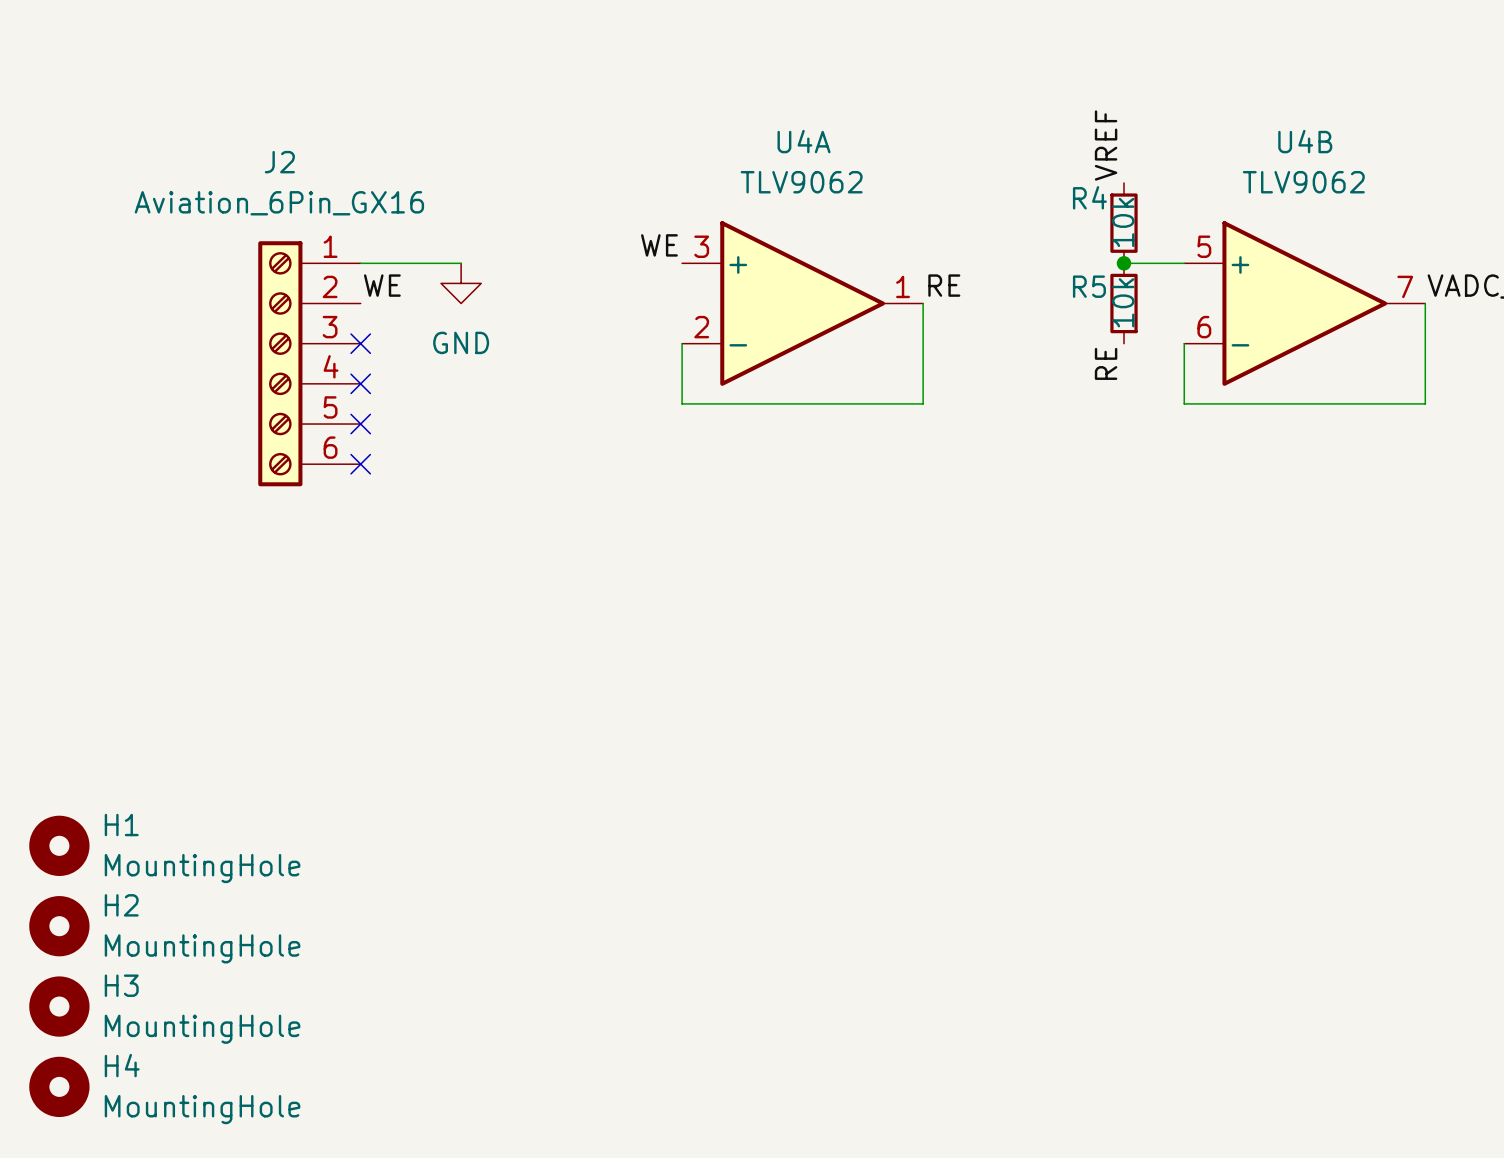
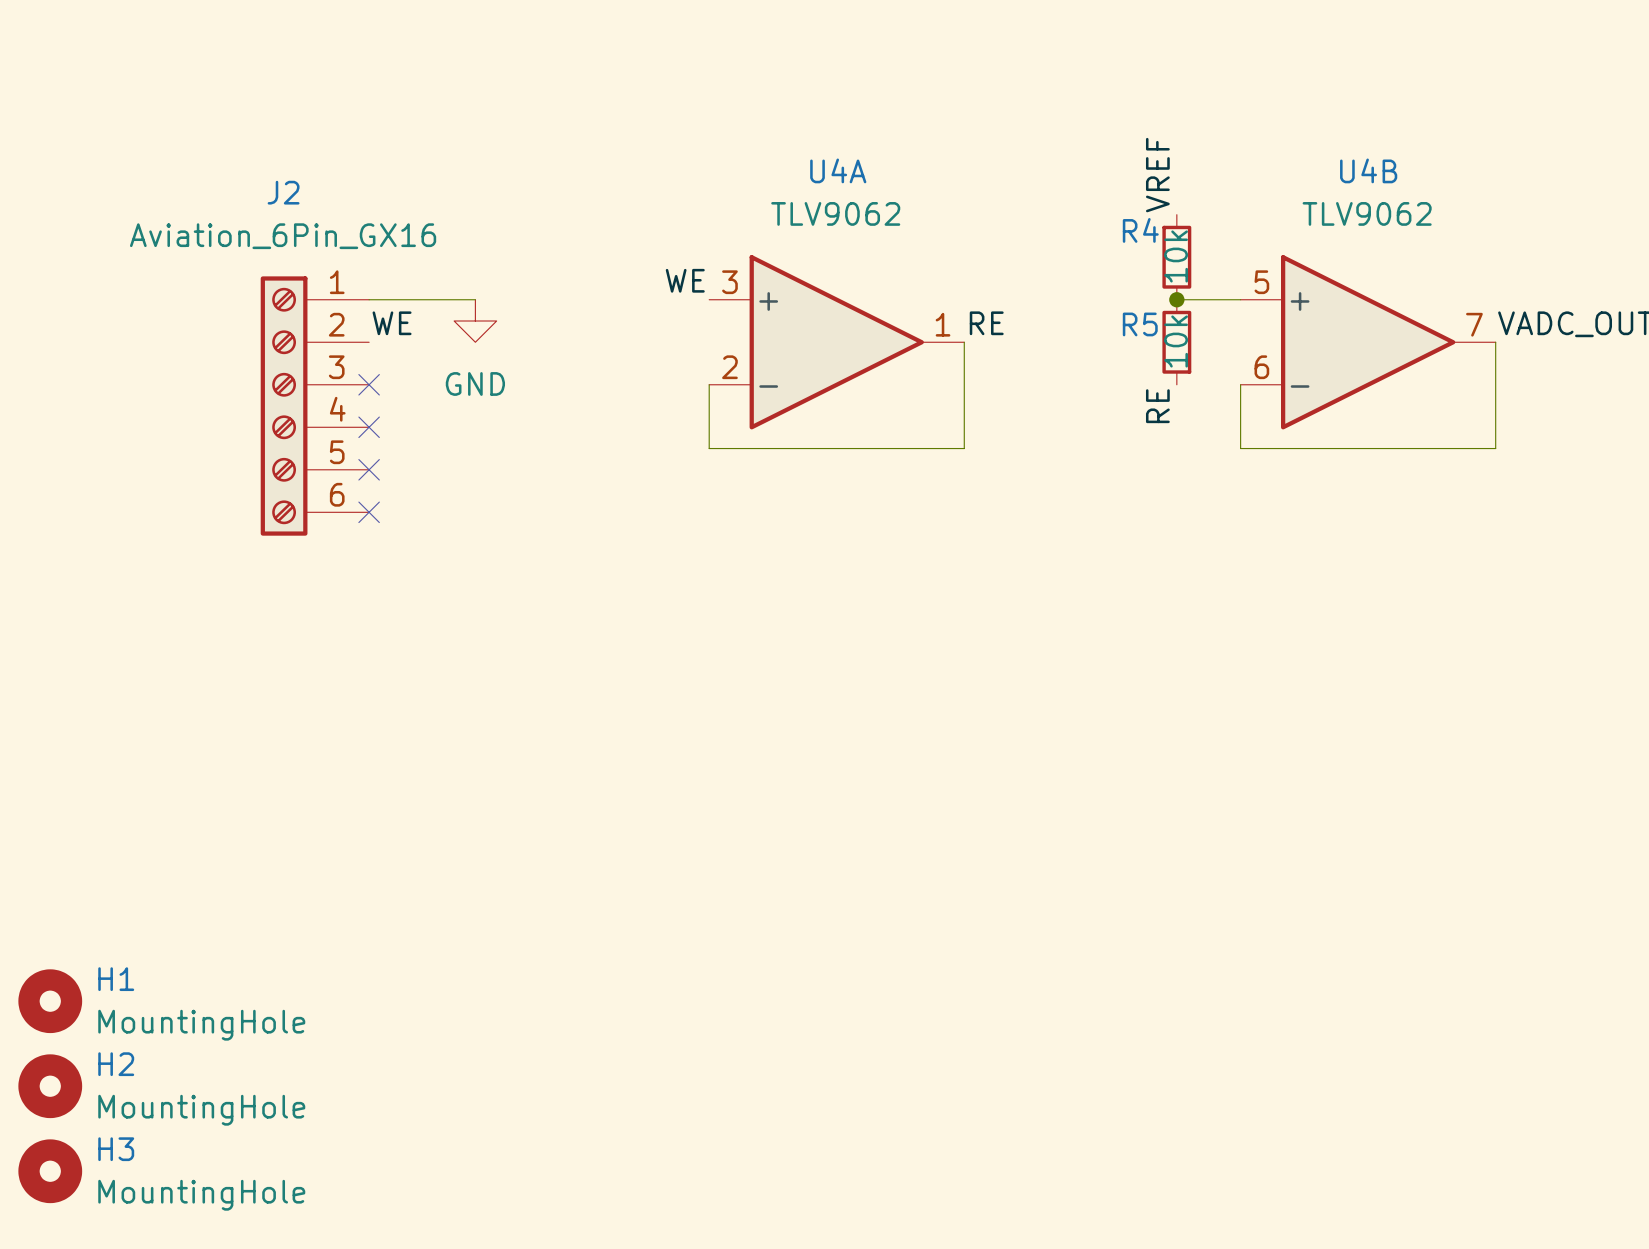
H1: MountingHole (59, 845) -> none
H2 name: H2 (121, 905) -> H1 (116, 979)
H3 name: H3 (121, 985) -> H2 (116, 1064)
H4 name: H4 (122, 1065) -> H3 (116, 1149)

